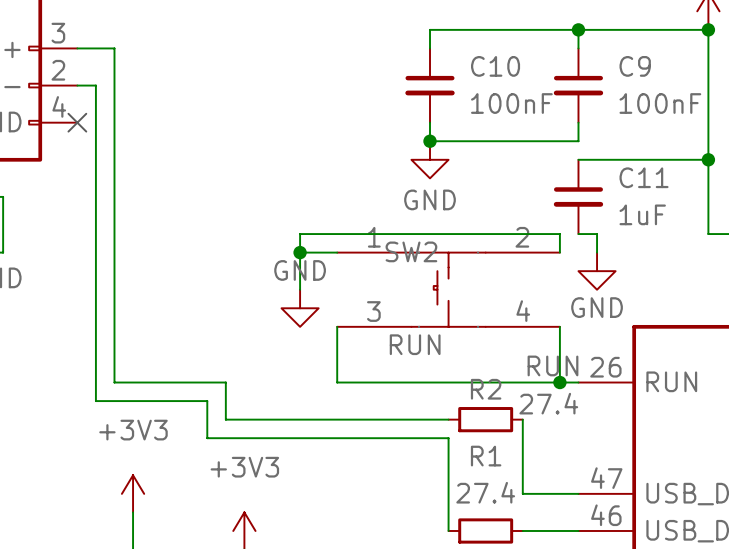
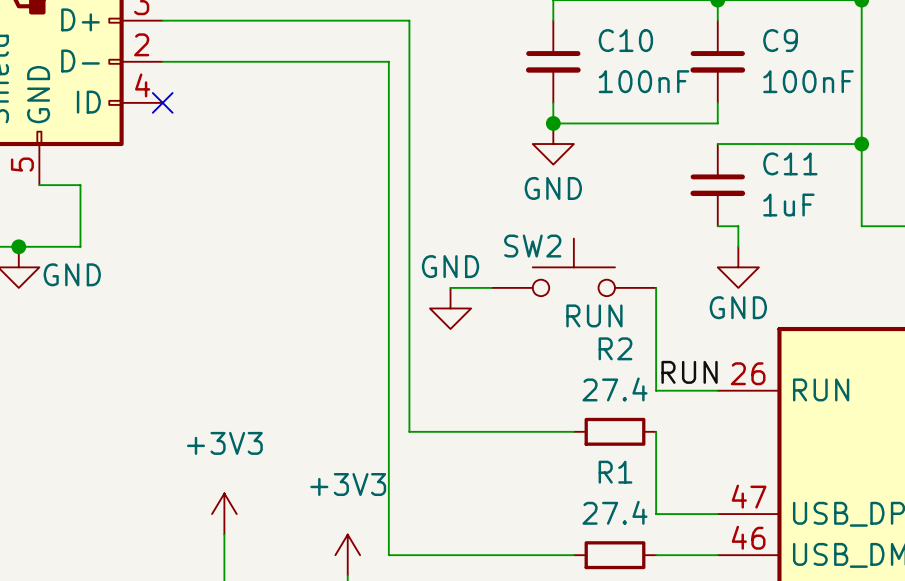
wire: (114, 48) (114, 382) (225, 382) (225, 419) (300, 419) -> (203, 20) (409, 20) (409, 226)
wire: (95, 85) (95, 401) (207, 401) (207, 438) (448, 438) (448, 530) -> (183, 61) (388, 61) (388, 555) (573, 555)
wire: (300, 234) (559, 234) (559, 252) -> none
wire: (300, 252) (337, 252) -> (450, 287) (491, 287)
junction: (300, 252) -> none
SW2 symbol: [337, 252, 560, 327] -> [491, 238, 657, 297]
wire: none -> (409, 287) (409, 431)
power symbol position: GND (300, 308) -> GND (450, 308)
wire: (337, 326) (337, 382) (522, 382) -> (656, 287) (656, 390)
wire: (559, 326) (559, 382) -> none
SW2 value position: RUN (415, 344) -> RUN (594, 315)
junction: (559, 382) -> none
R2 name position: R2 (486, 389) -> R2 (615, 348)
R2 value position: 27.4 (548, 403) -> 27.4 (614, 389)

